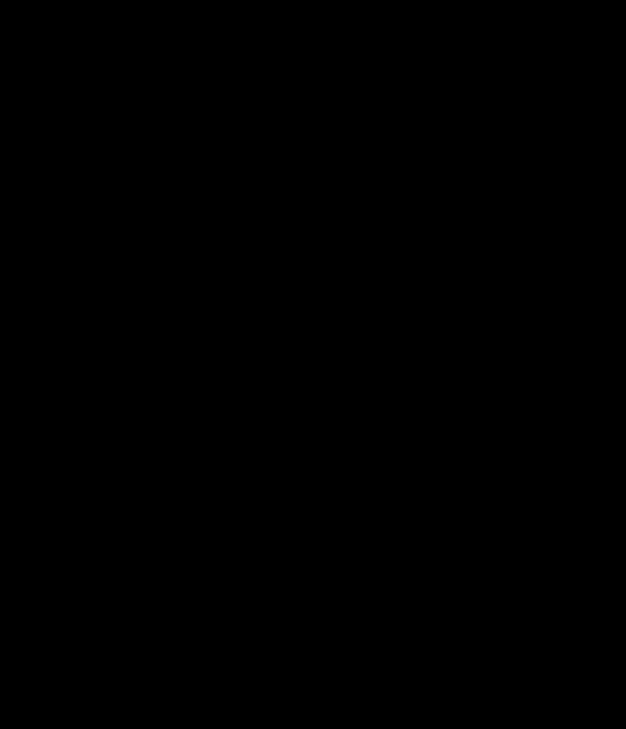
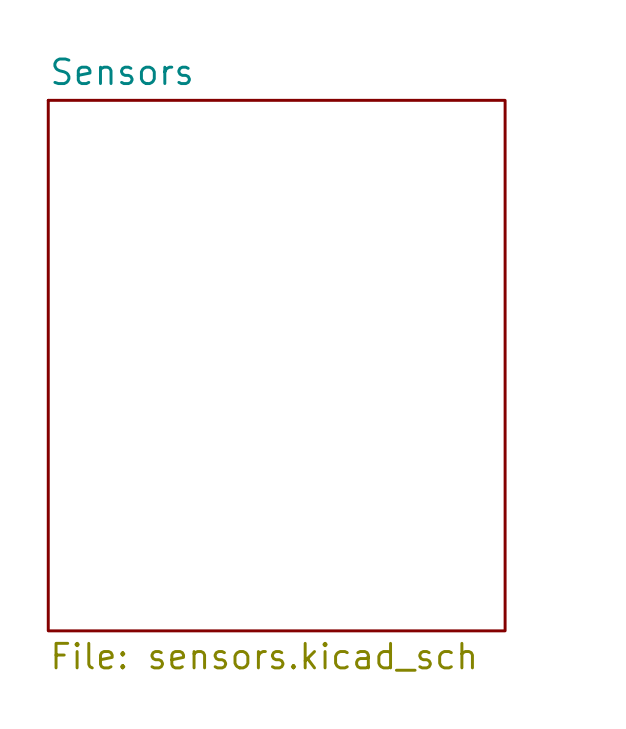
sheet Sensors: none -> File: sensors.kicad_sch (276, 365)

